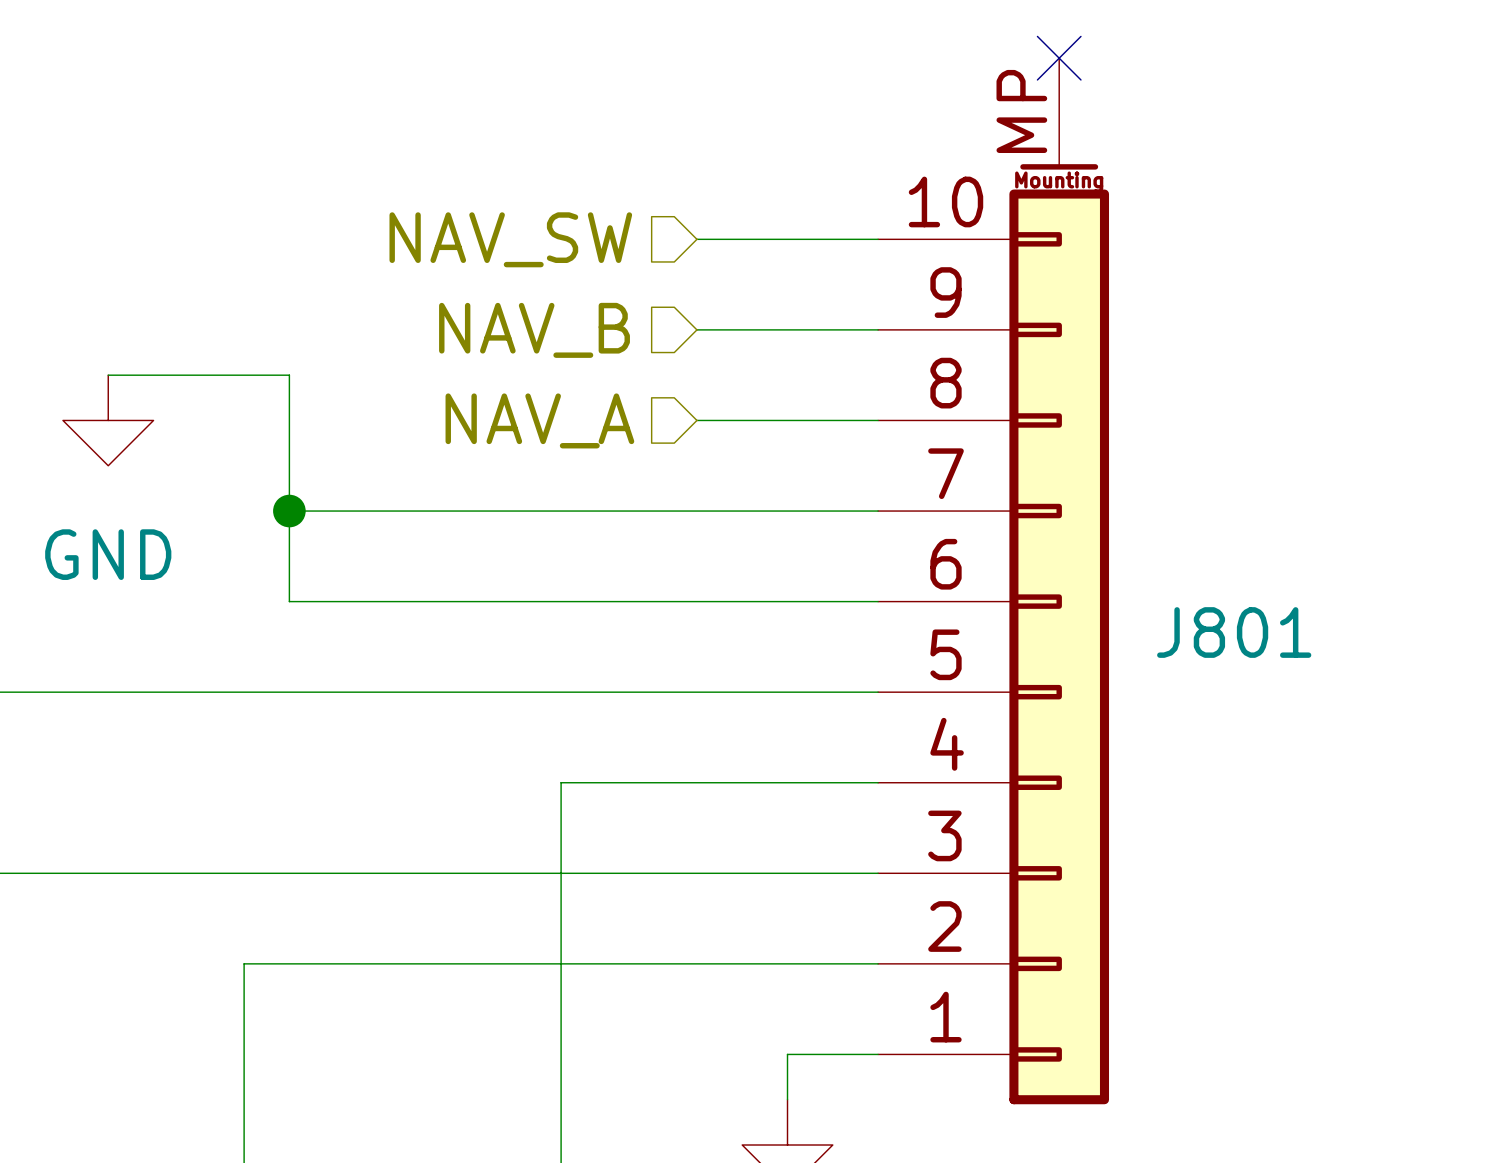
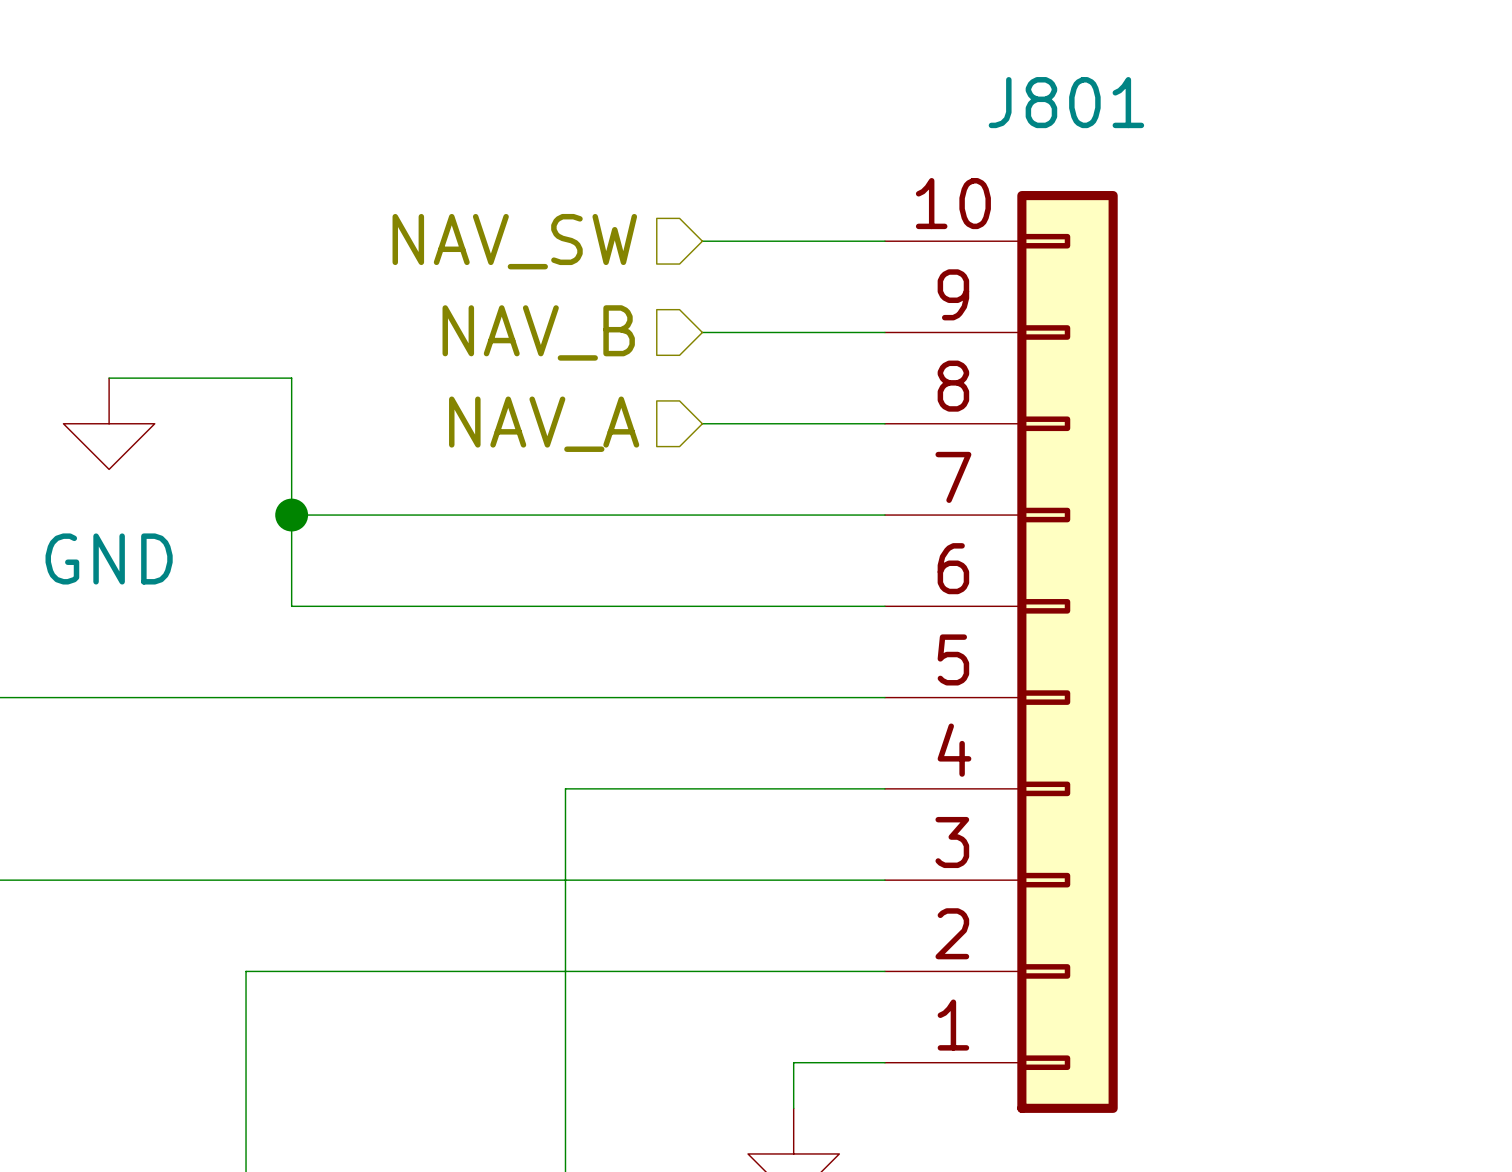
J801 symbol: [878, 58, 1110, 1105] -> [884, 191, 1118, 1113]
no-connect mark: (1059, 58) -> none
J801 name position: J801 (1234, 632) -> J801 (1066, 102)

